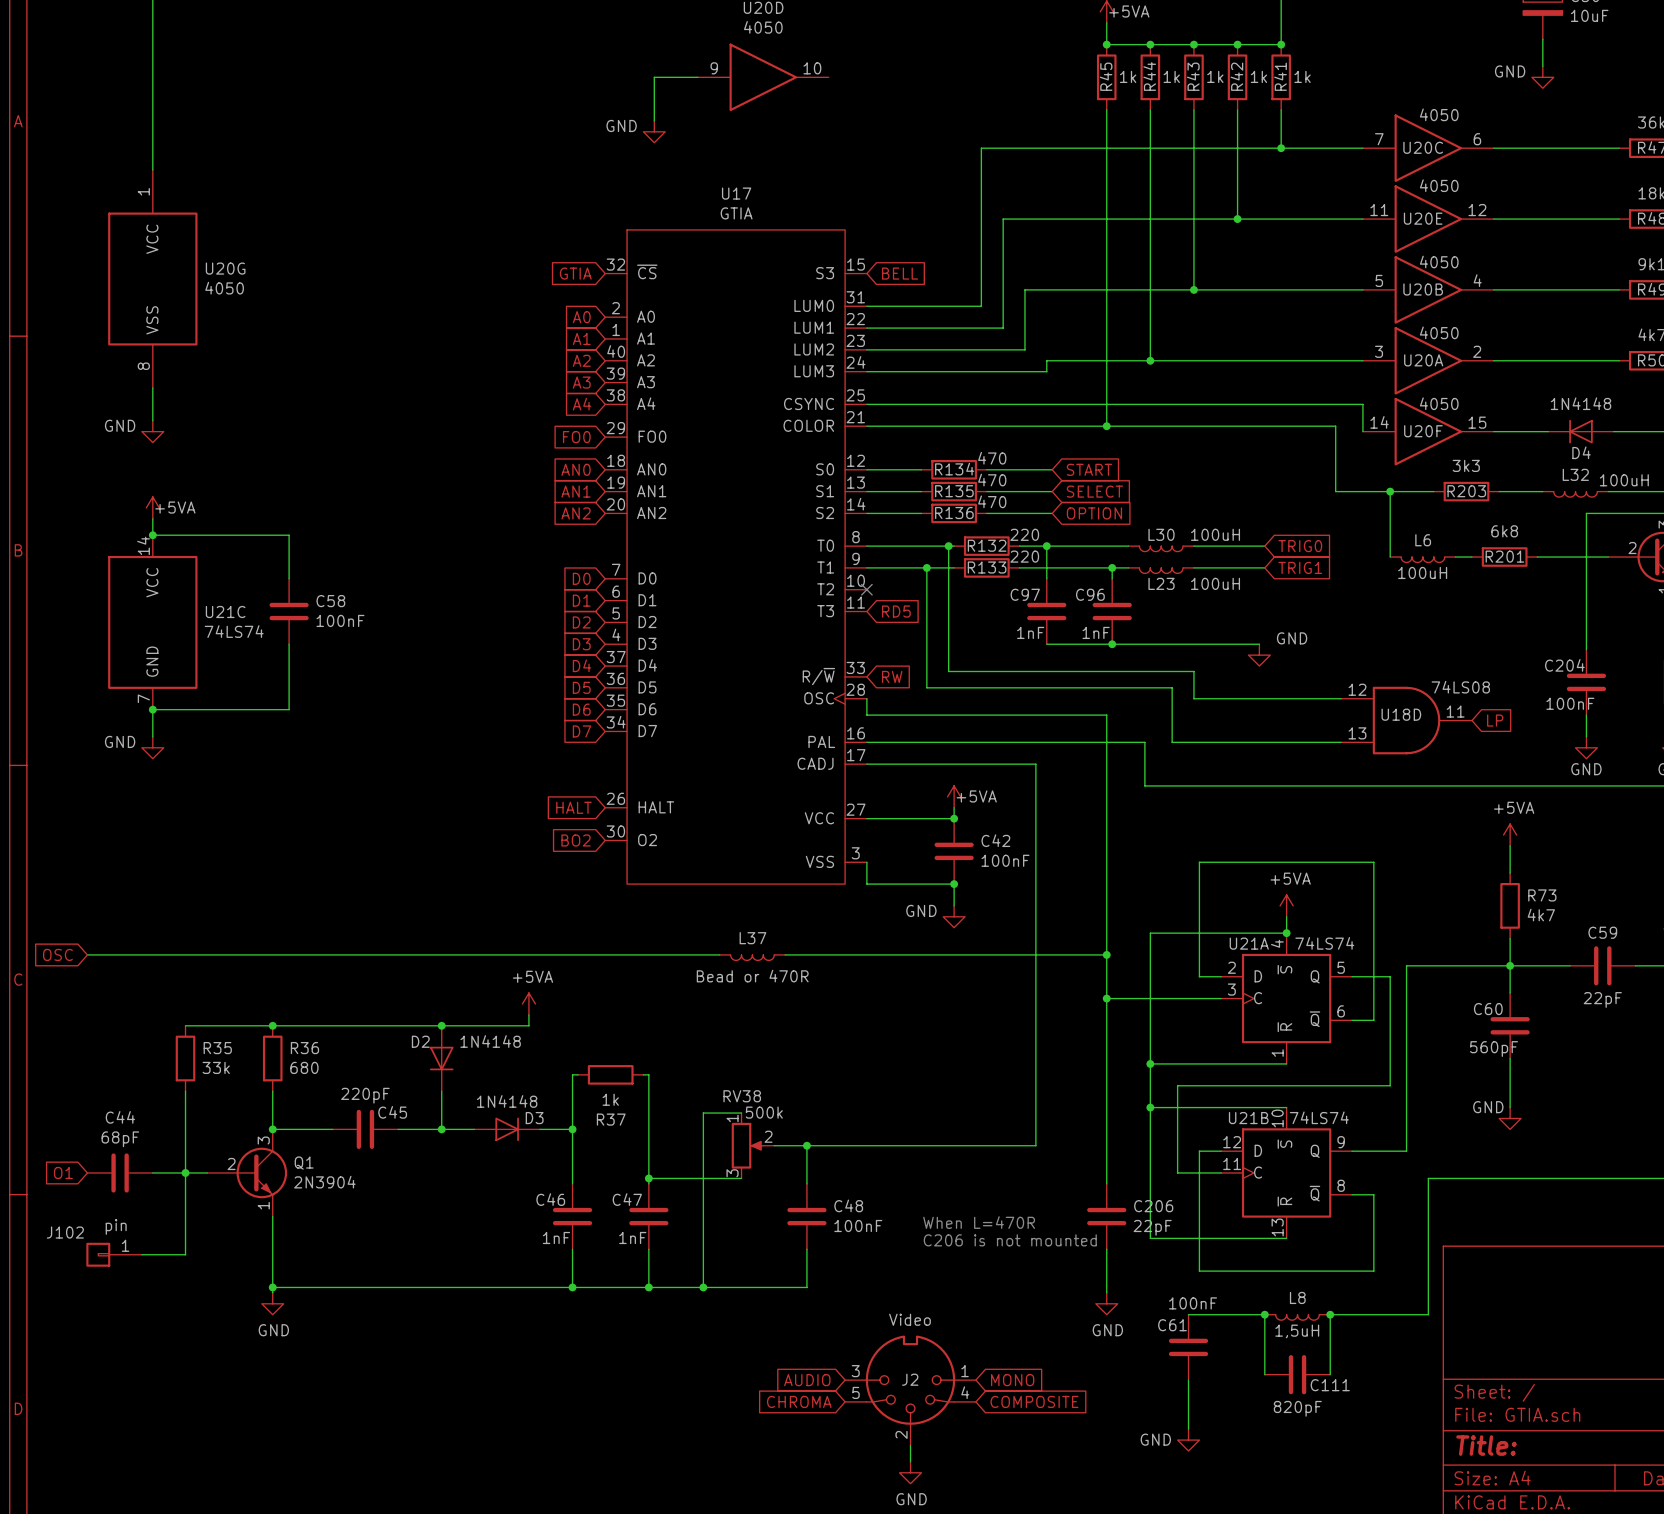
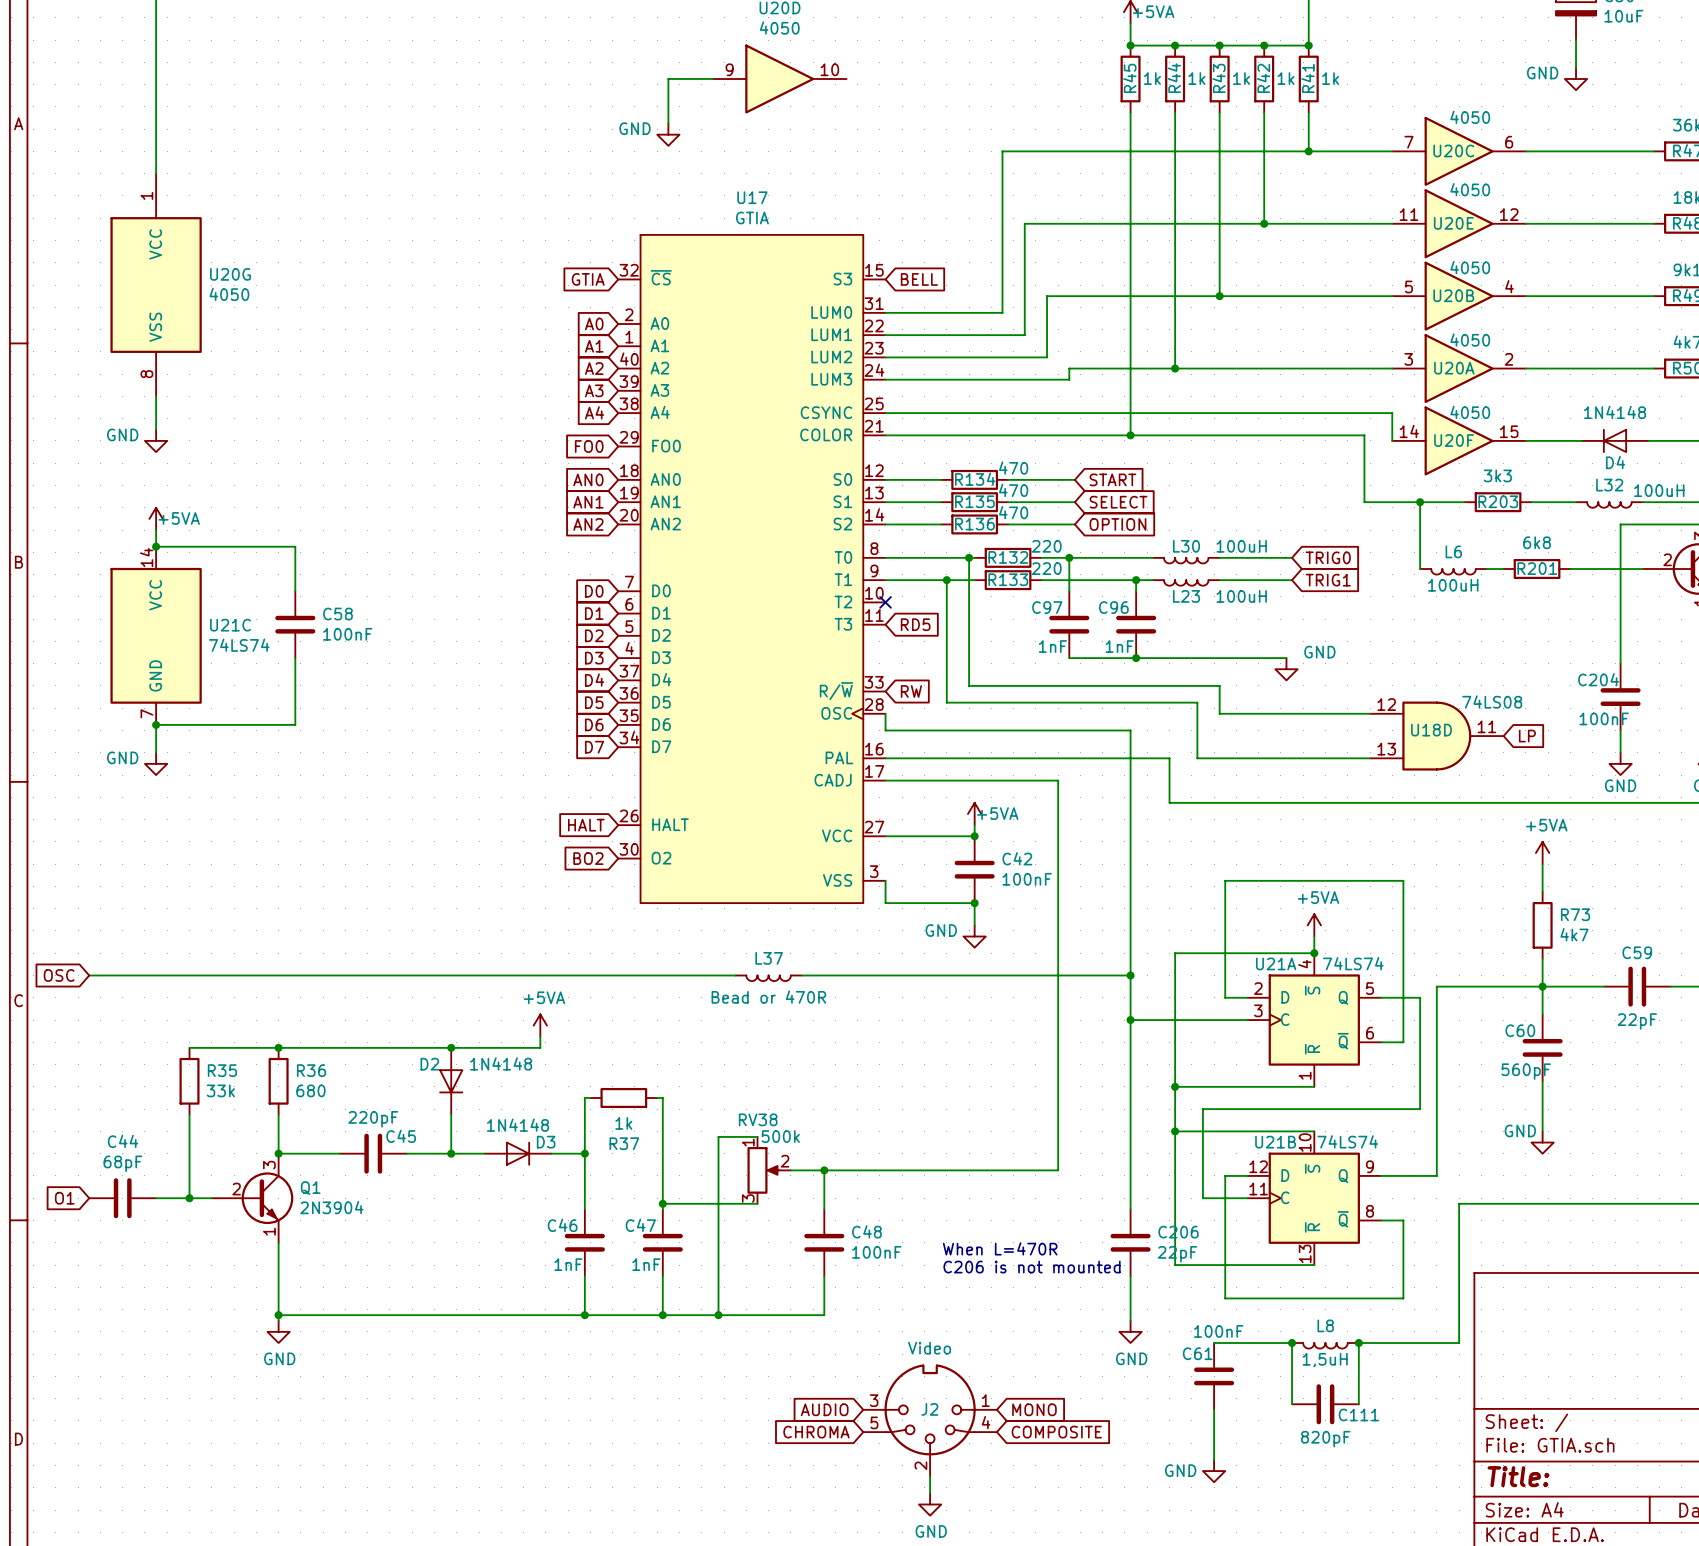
wire: (185, 1172) (185, 1254) (141, 1254) -> none
J102: pin (114, 1254) -> none

